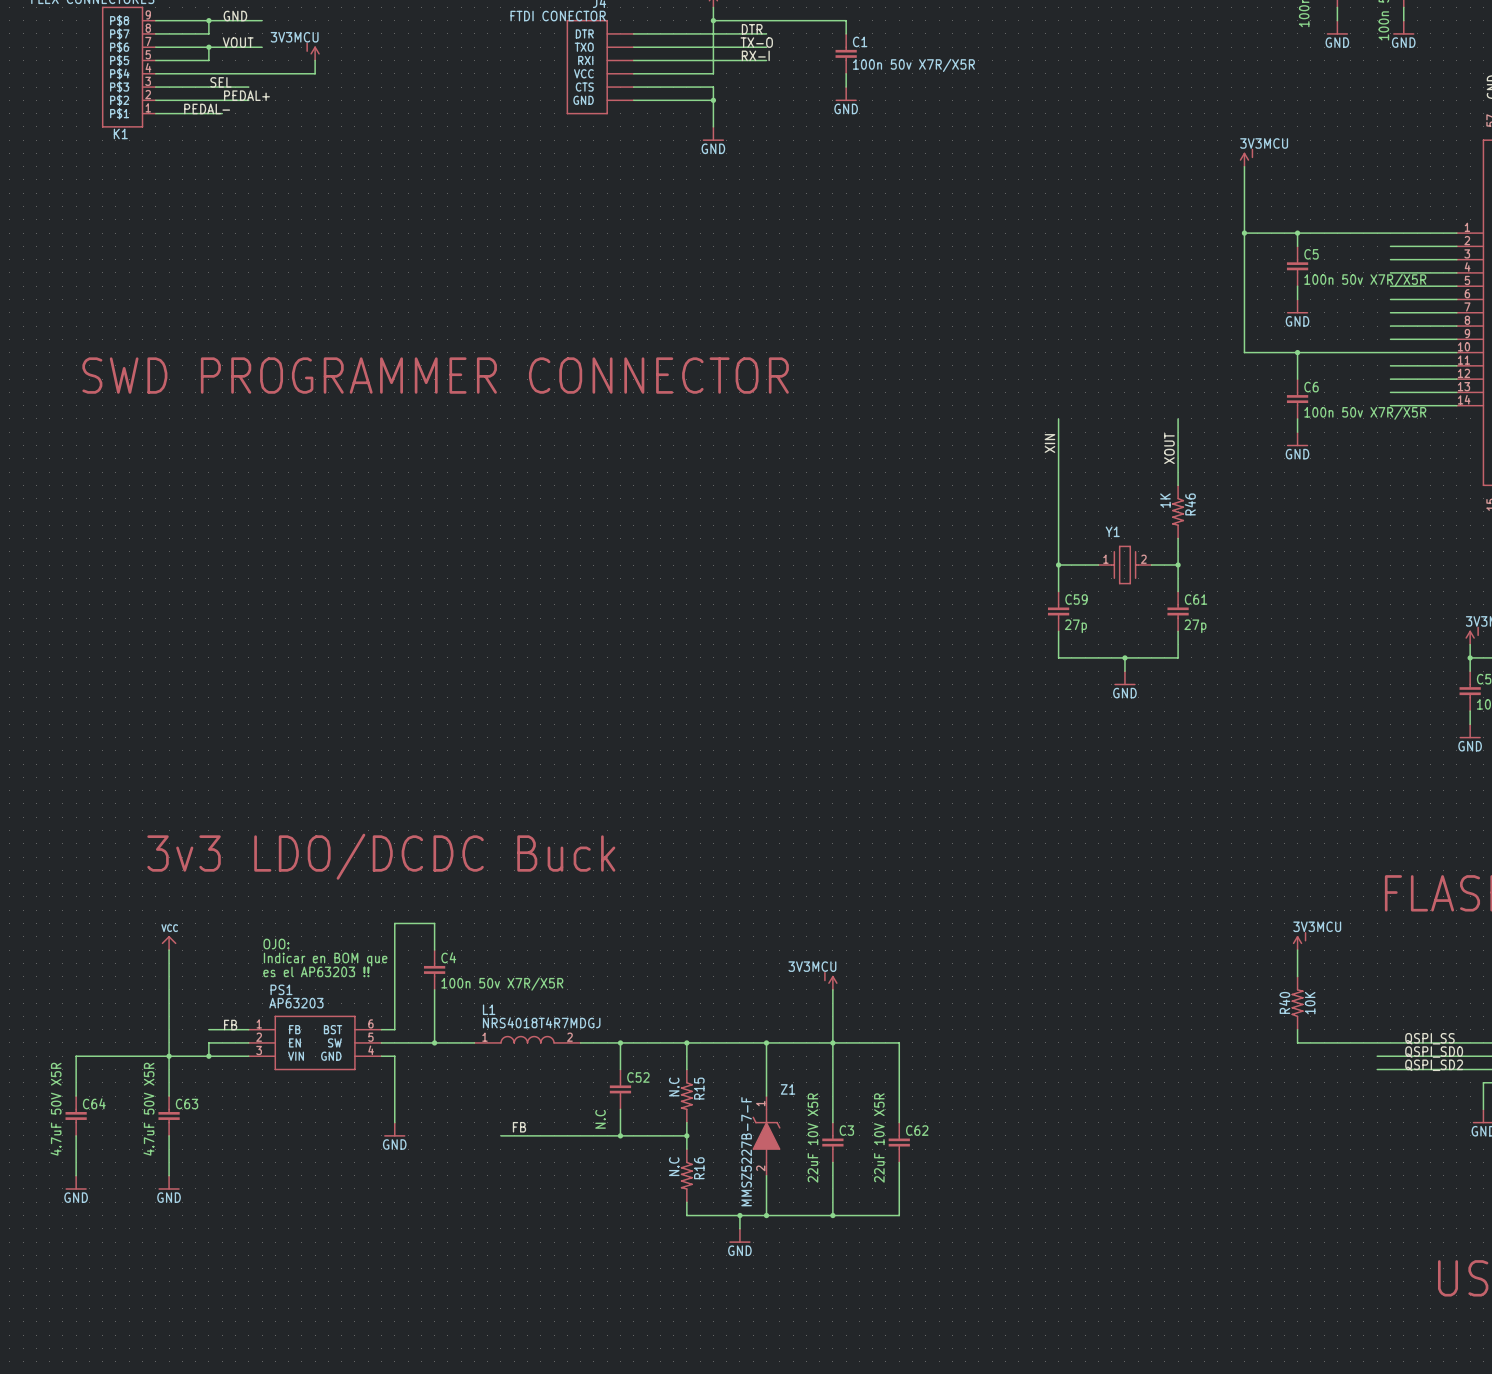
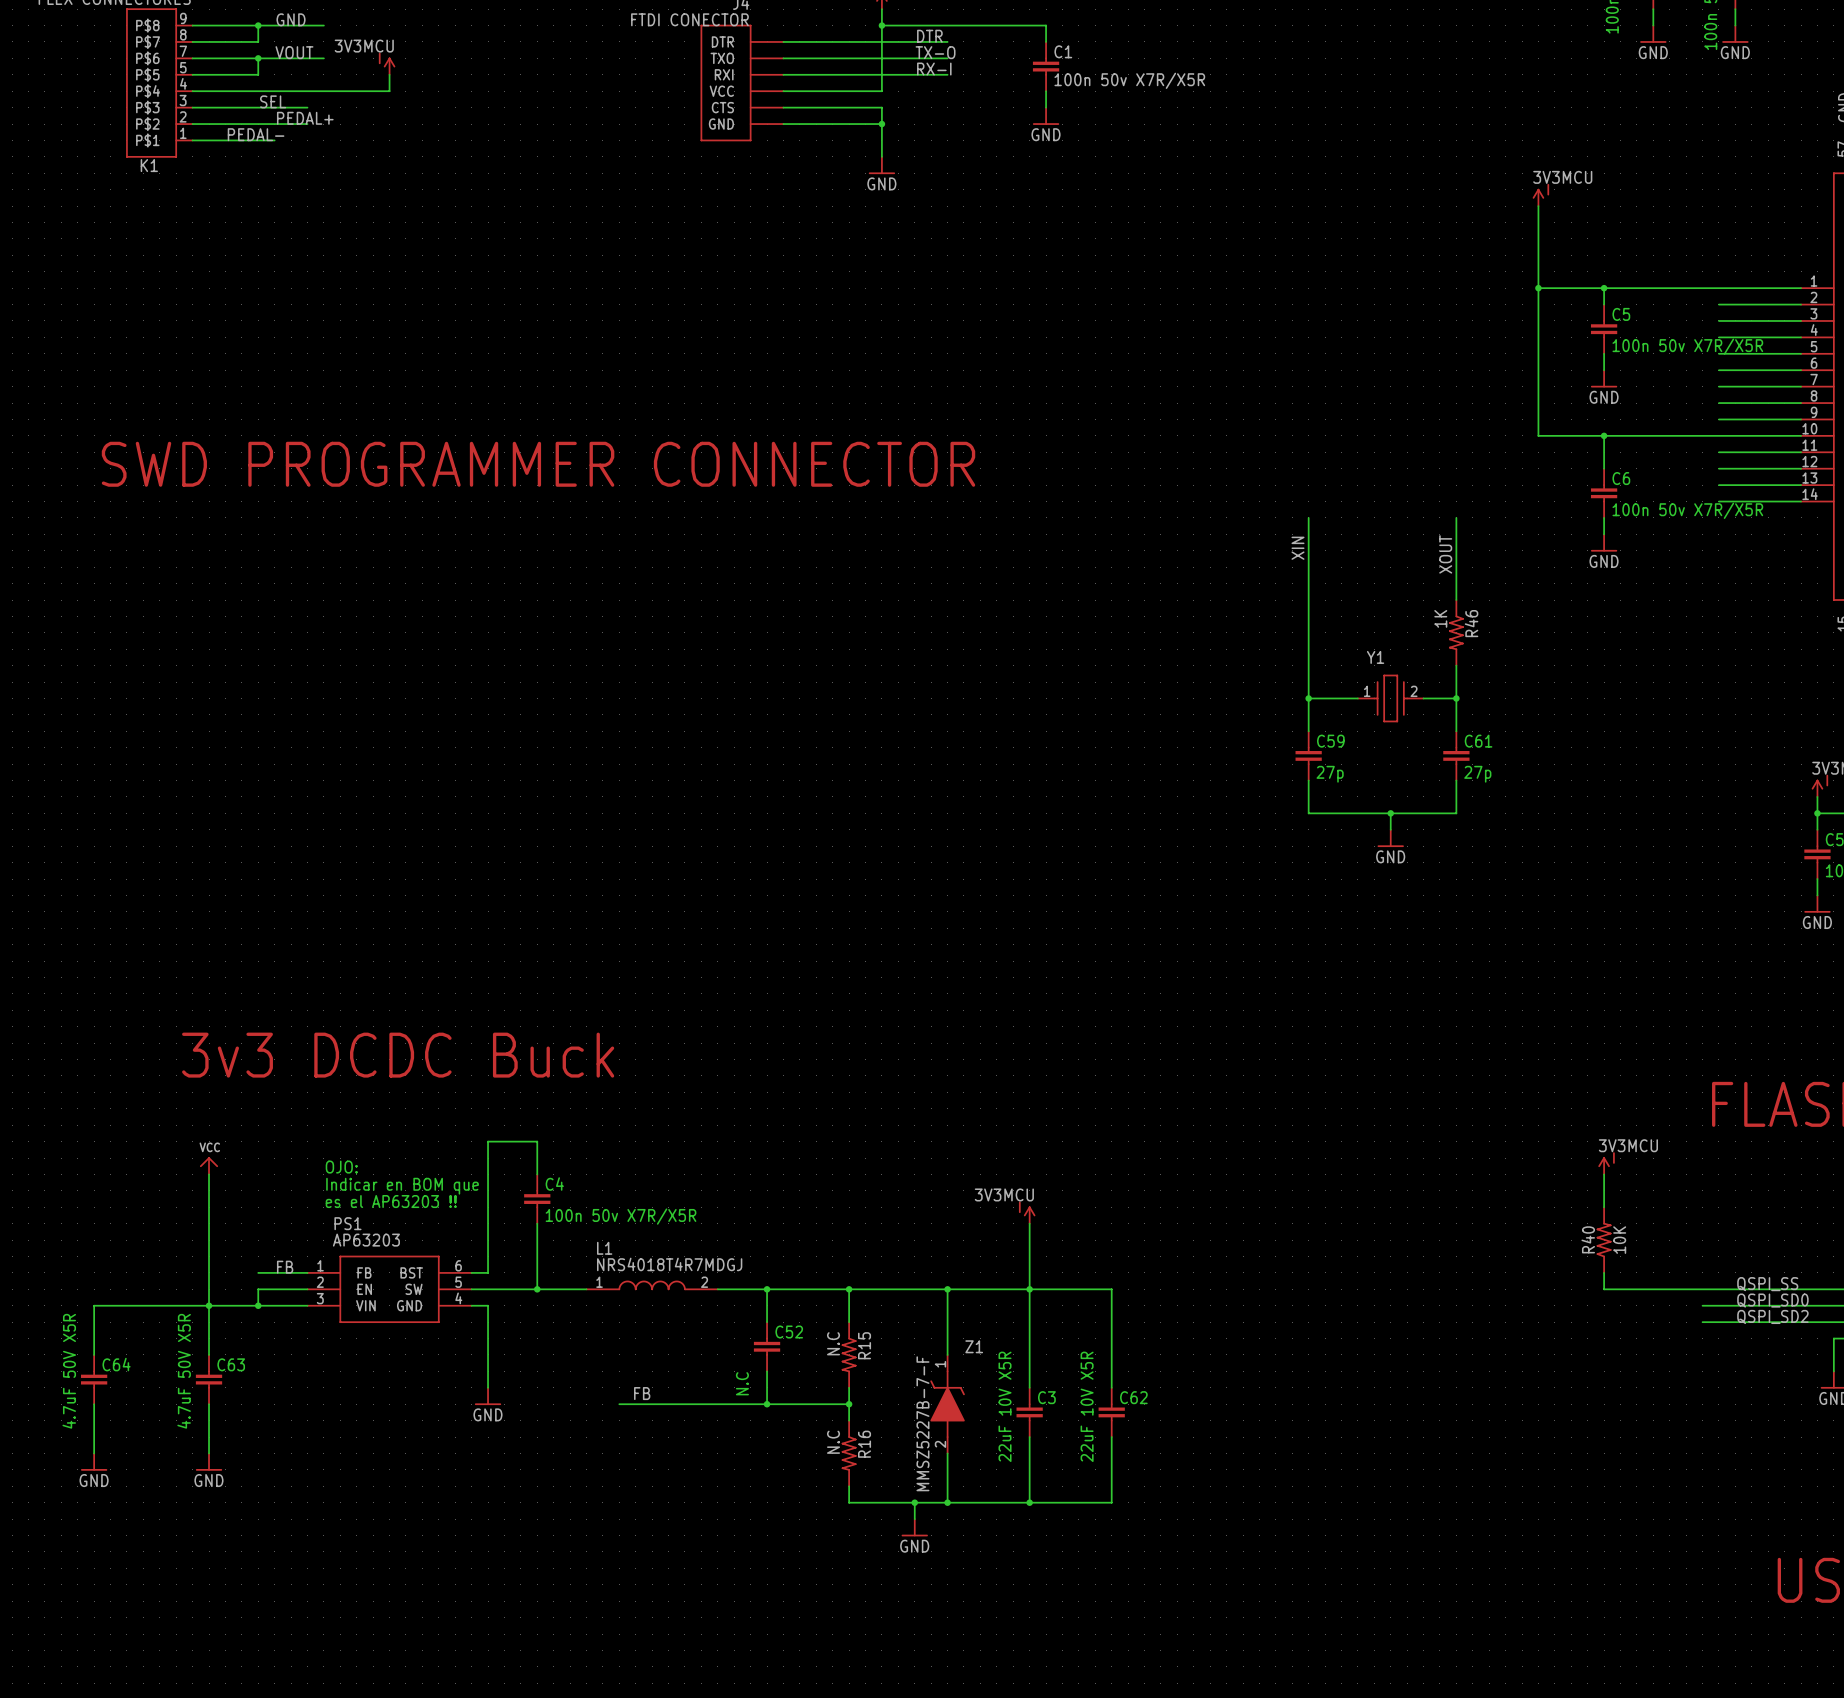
text: 3v3 LDO/DCDC Buck (381, 856) -> 3v3 DCDC Buck (398, 1055)

